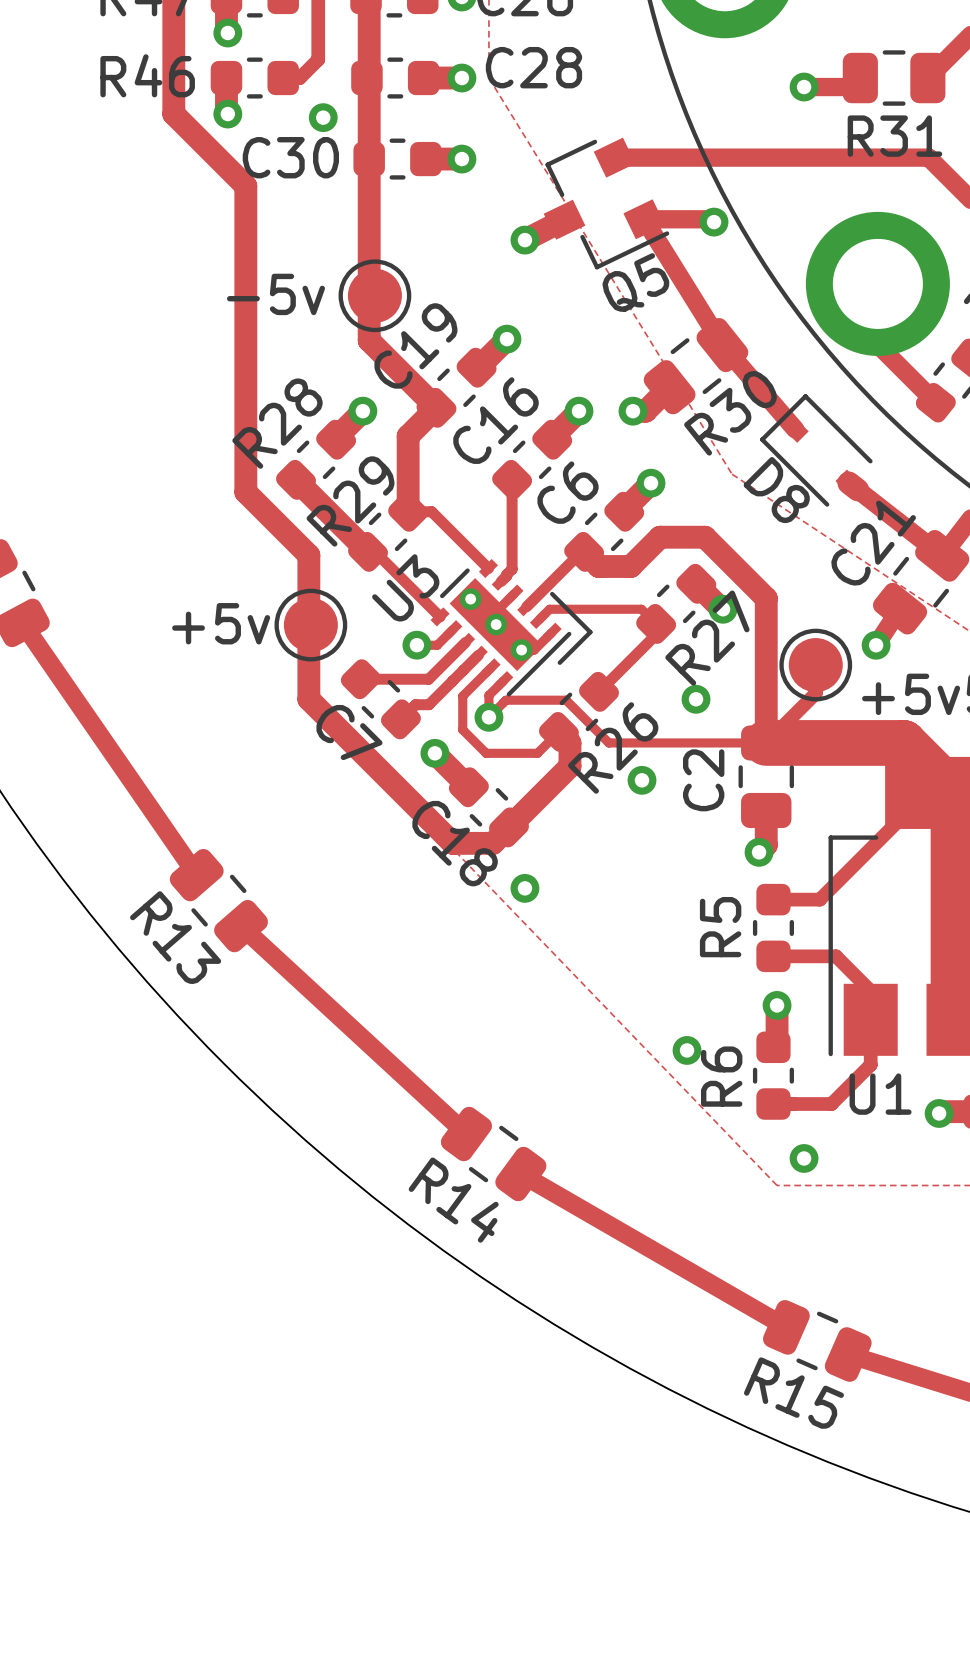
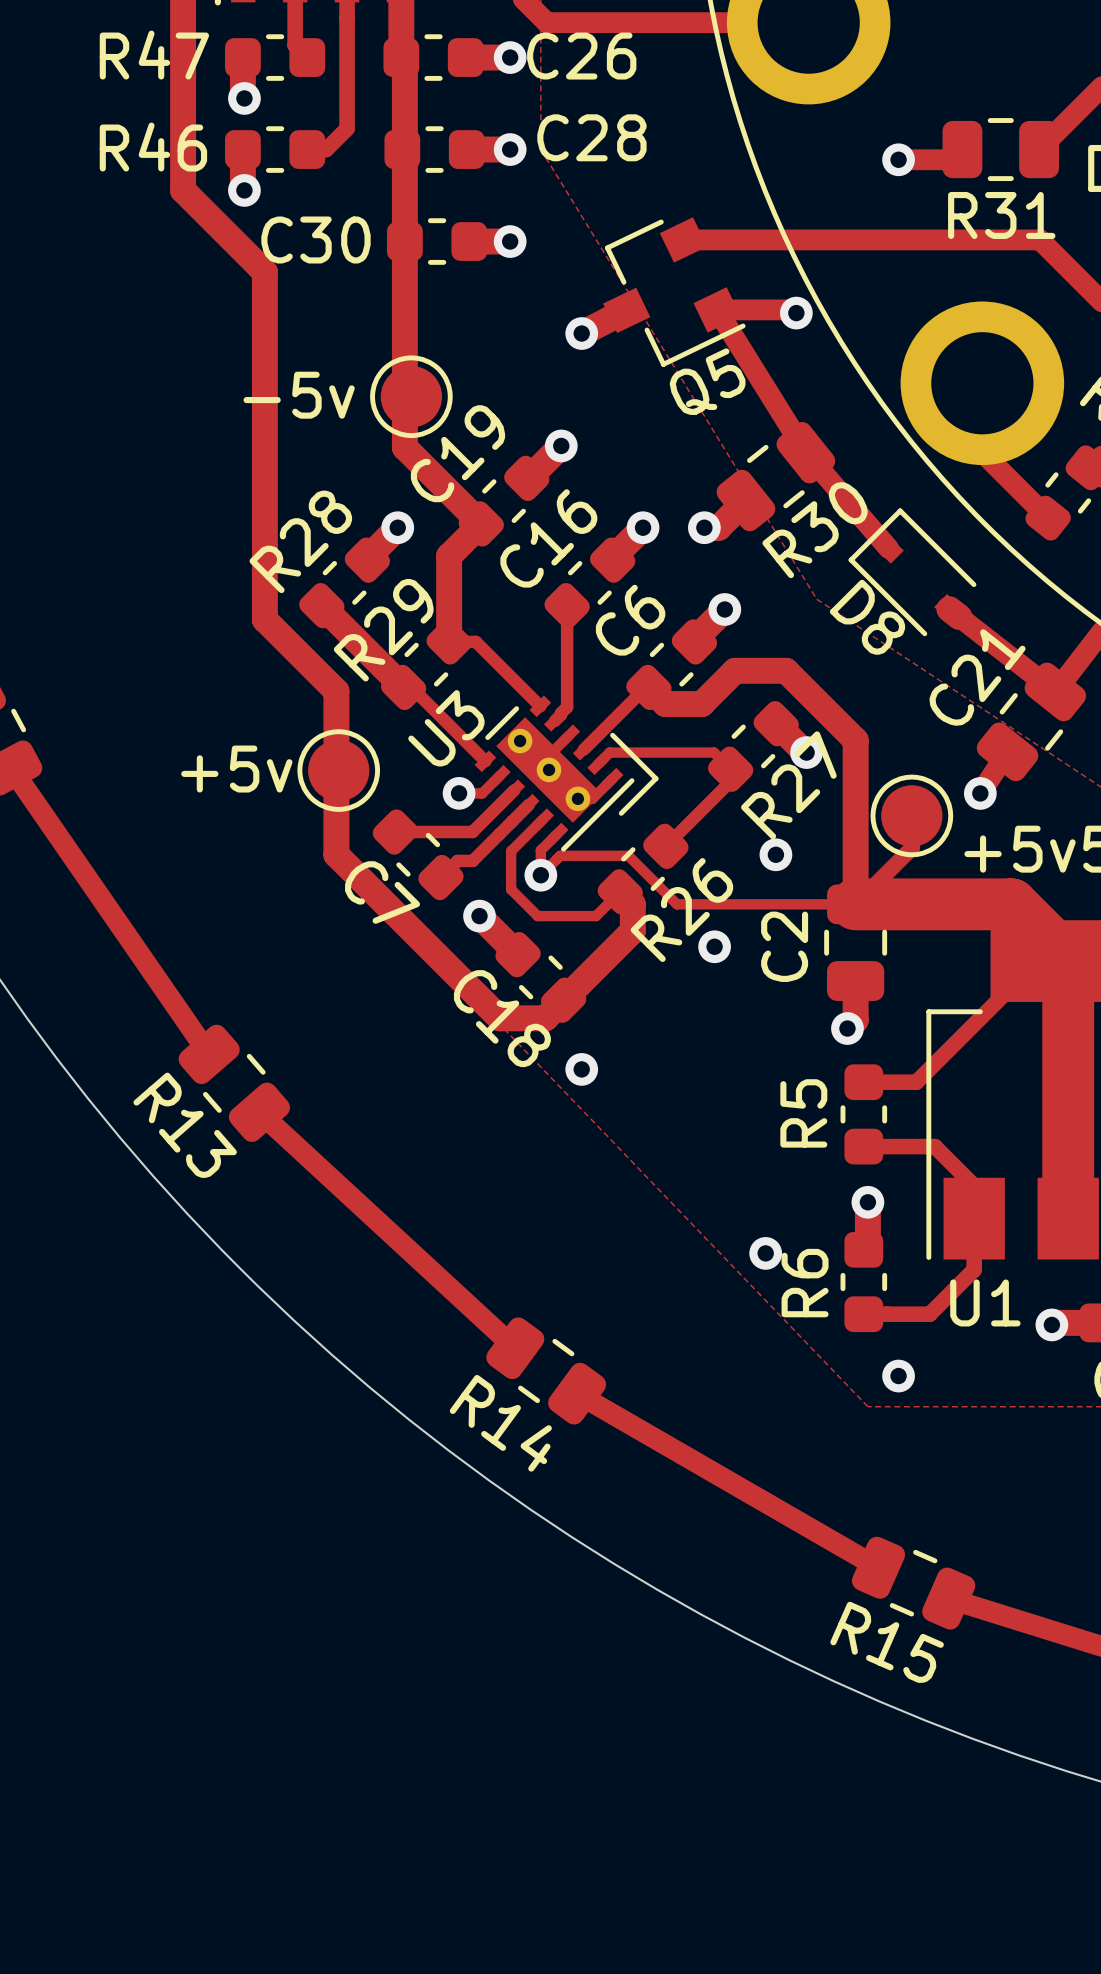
via: (323, 117) -> none

